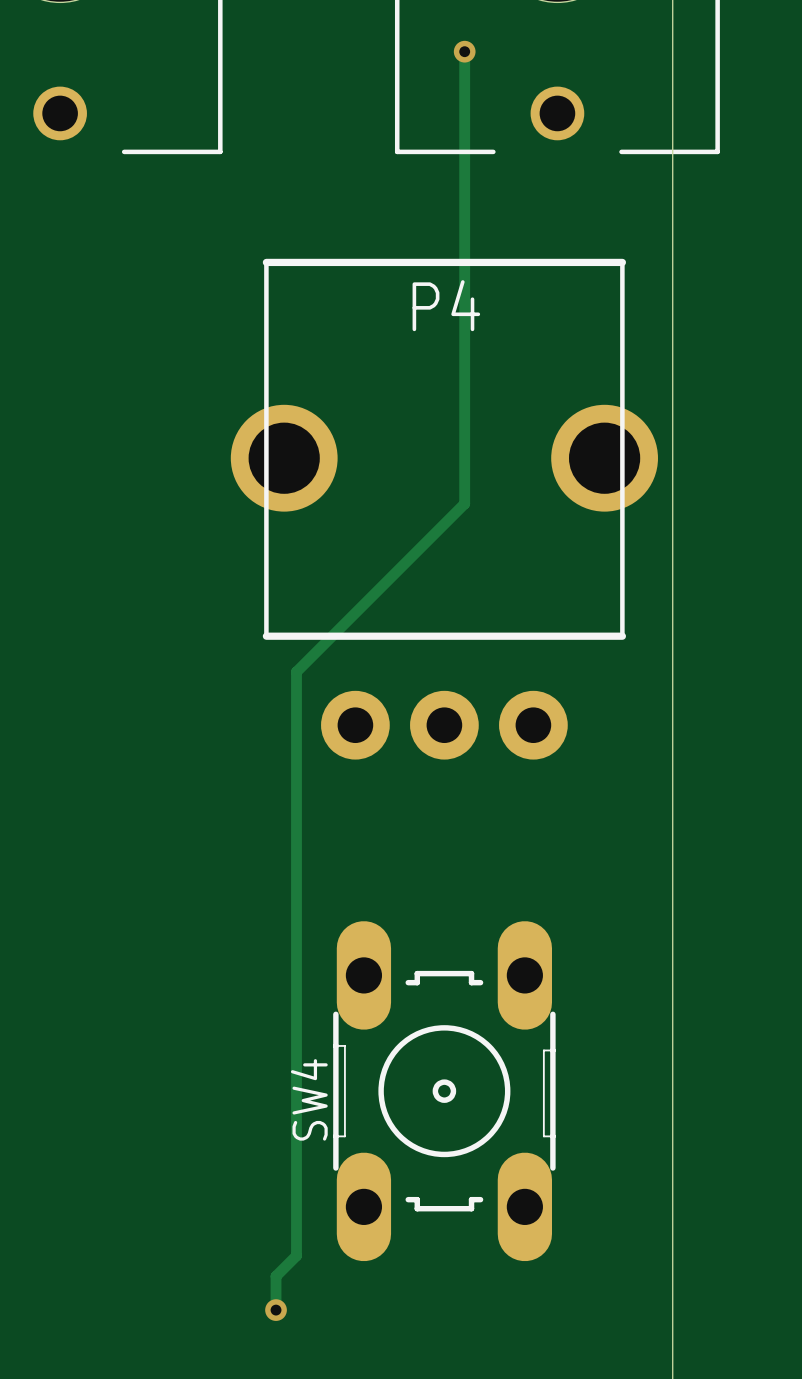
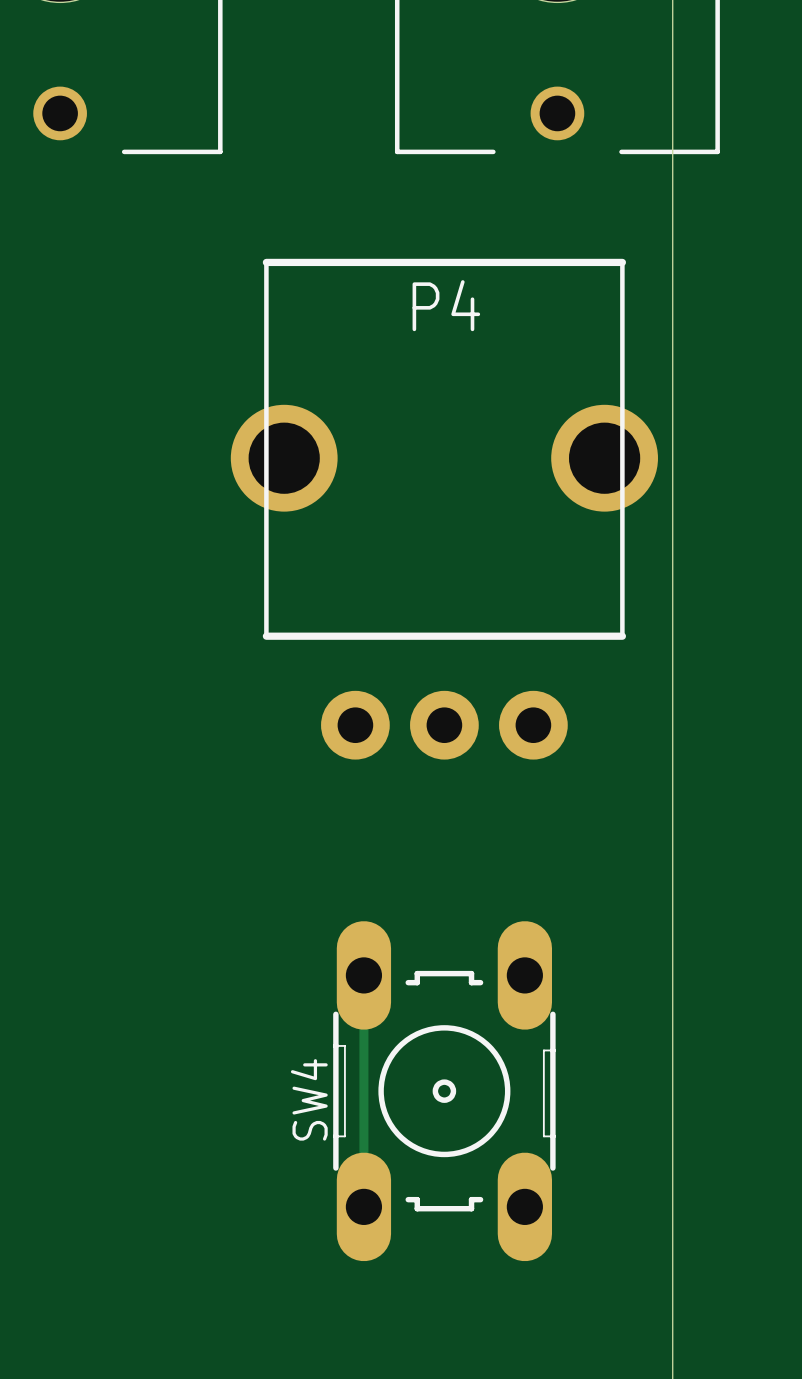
track: (464, 51) (464, 503) (296, 671) (296, 1255) (276, 1276) (276, 1310) -> none
via: (464, 51) -> none
track: none -> (363, 975) (363, 1206)
via: (276, 1310) -> none

